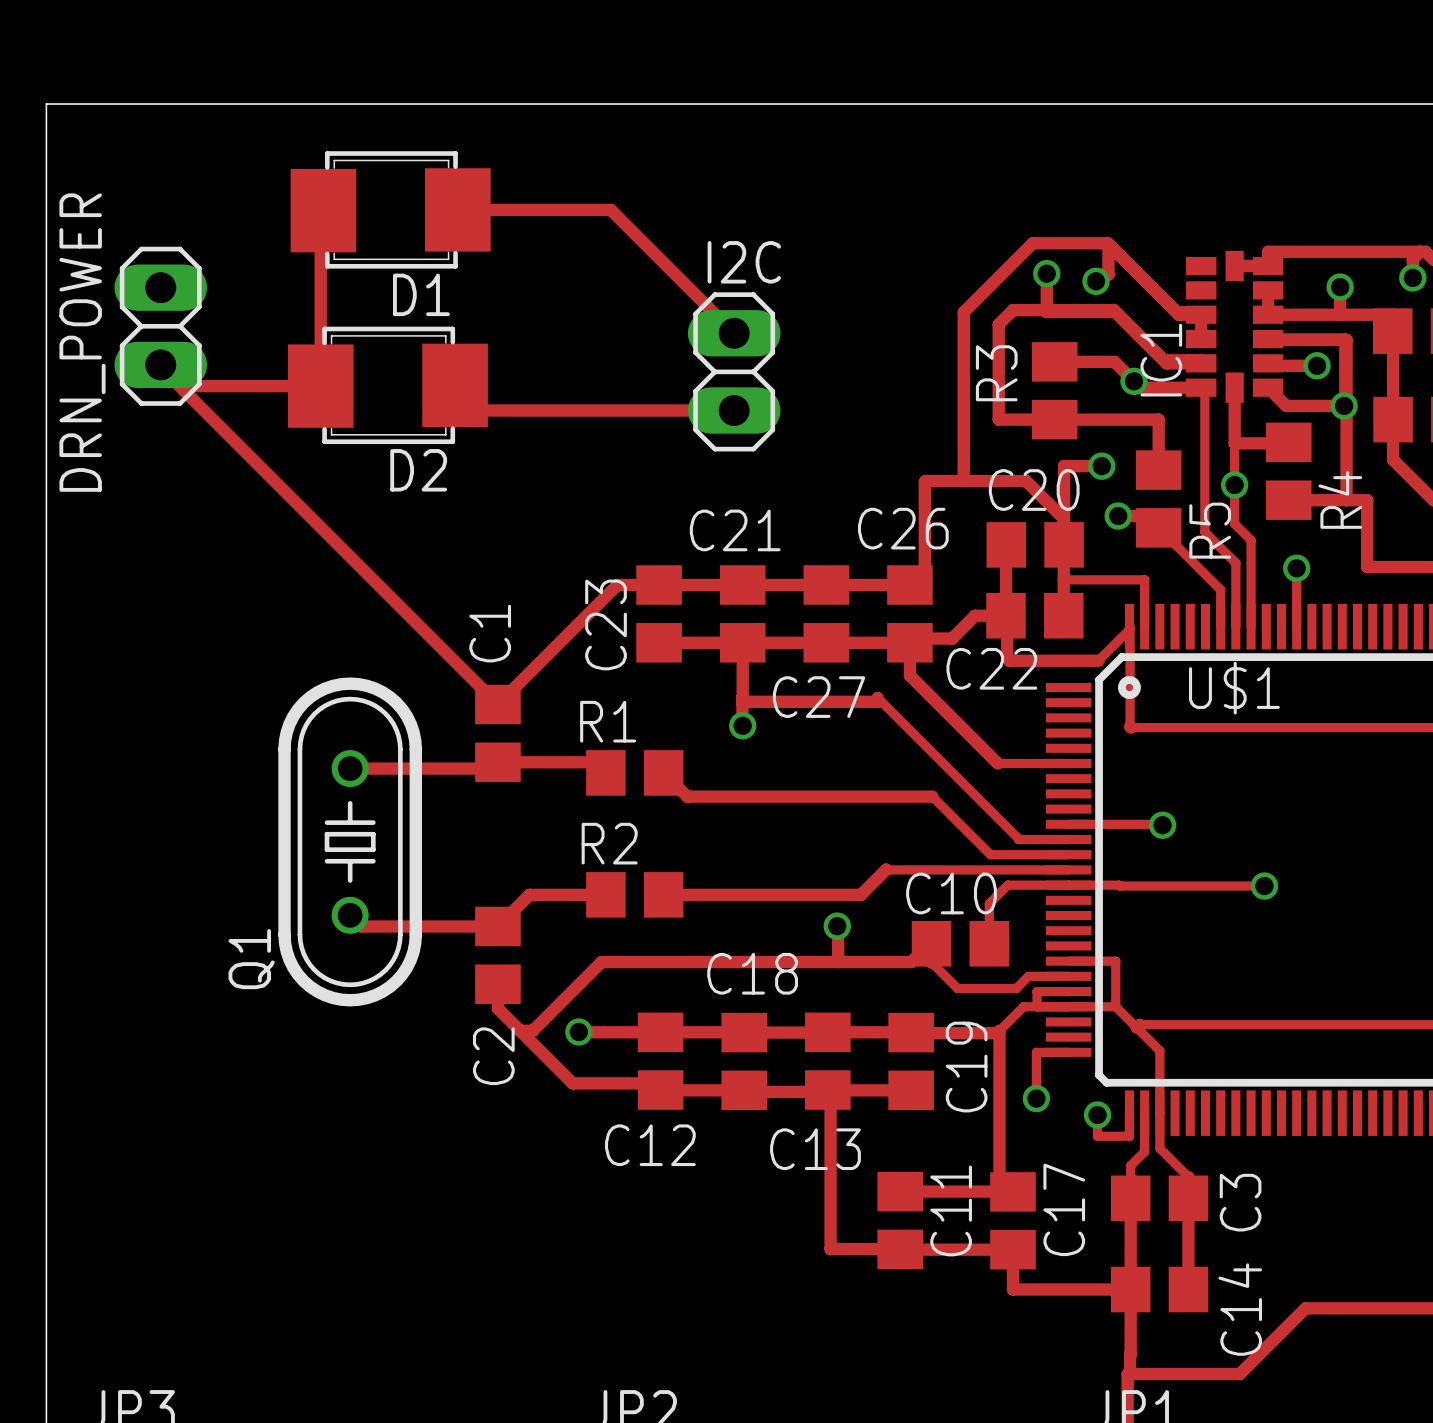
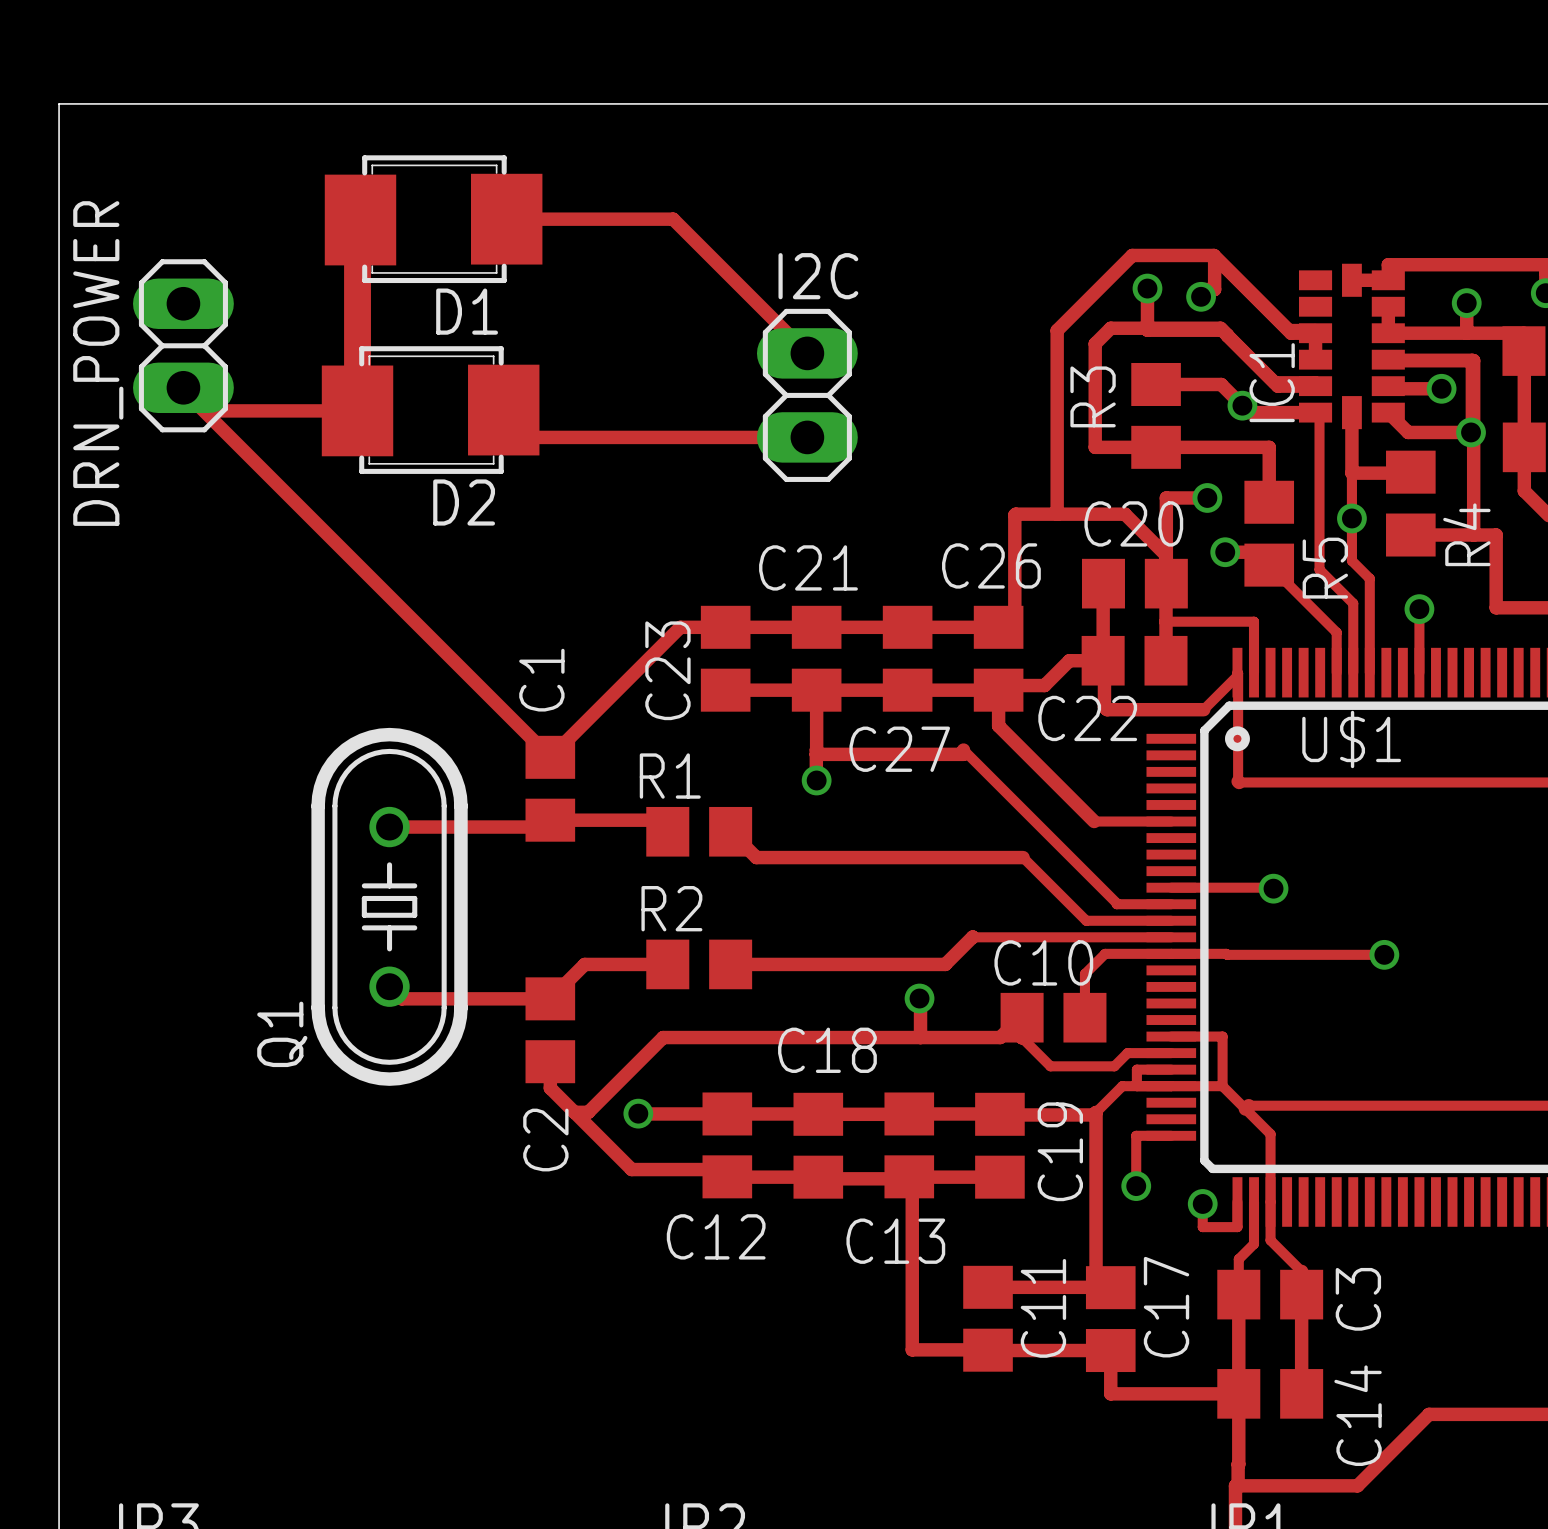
track width: thin (320, 210) (320, 386) -> thick (357, 220) (357, 410)

